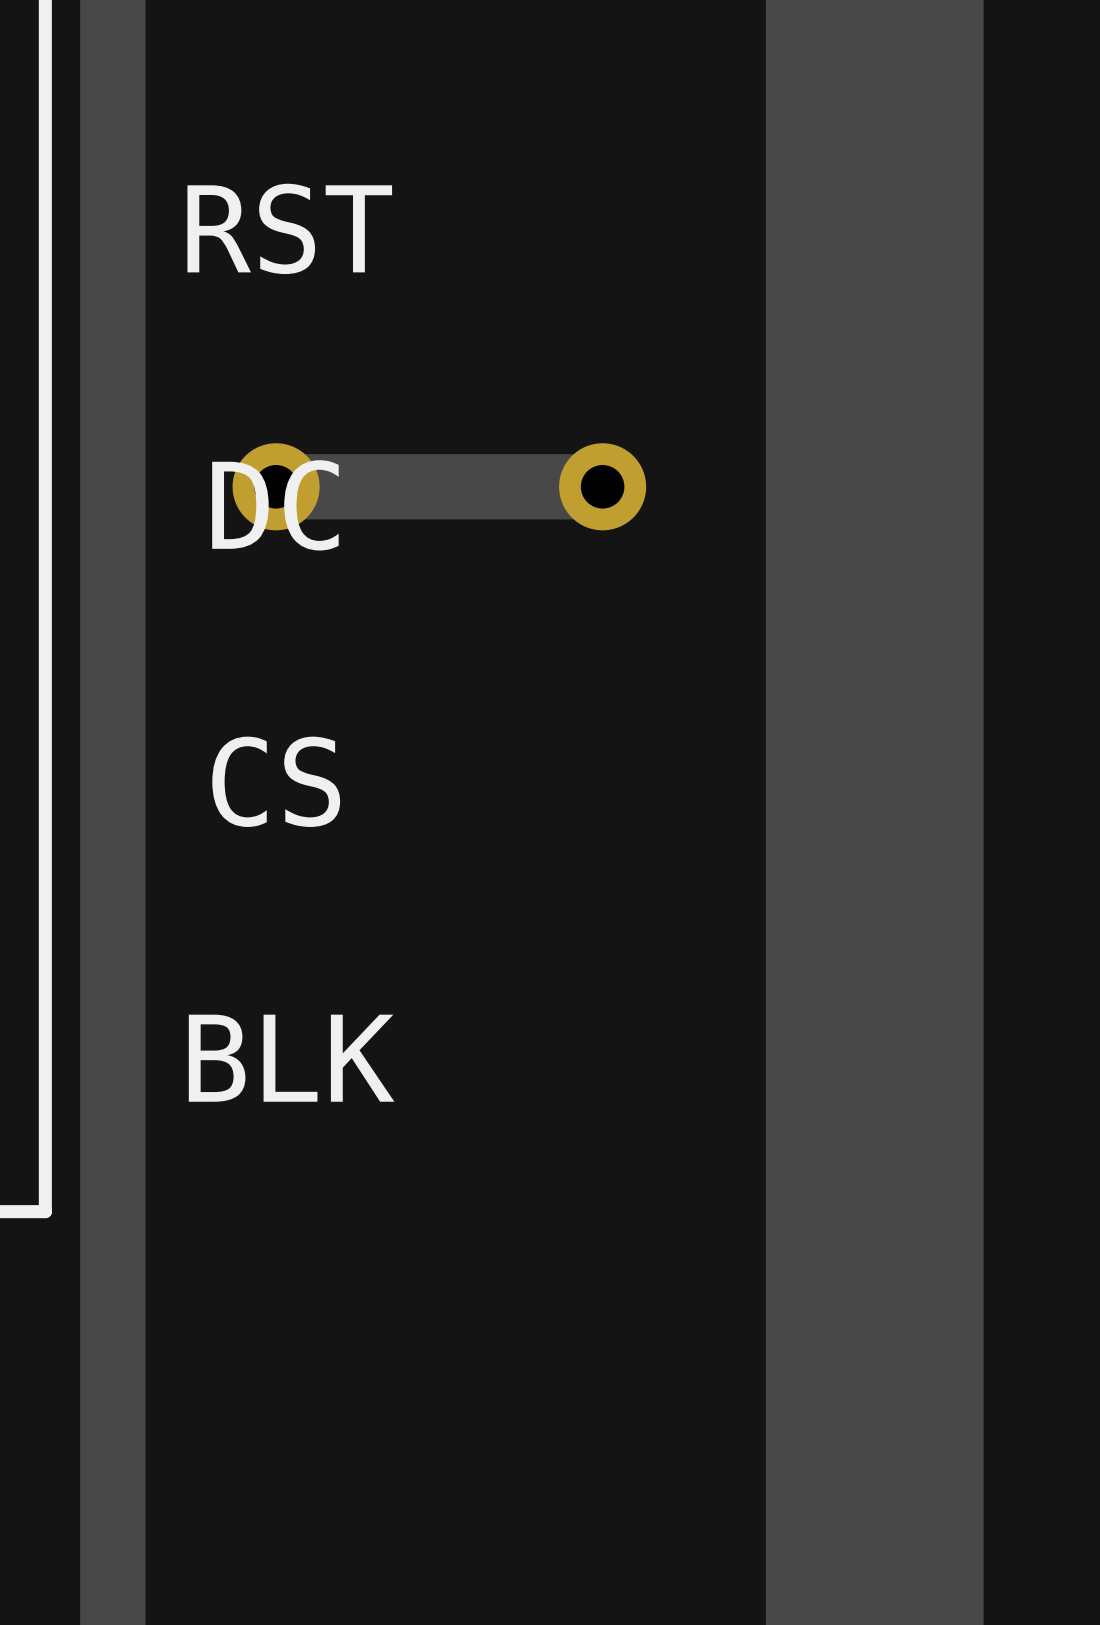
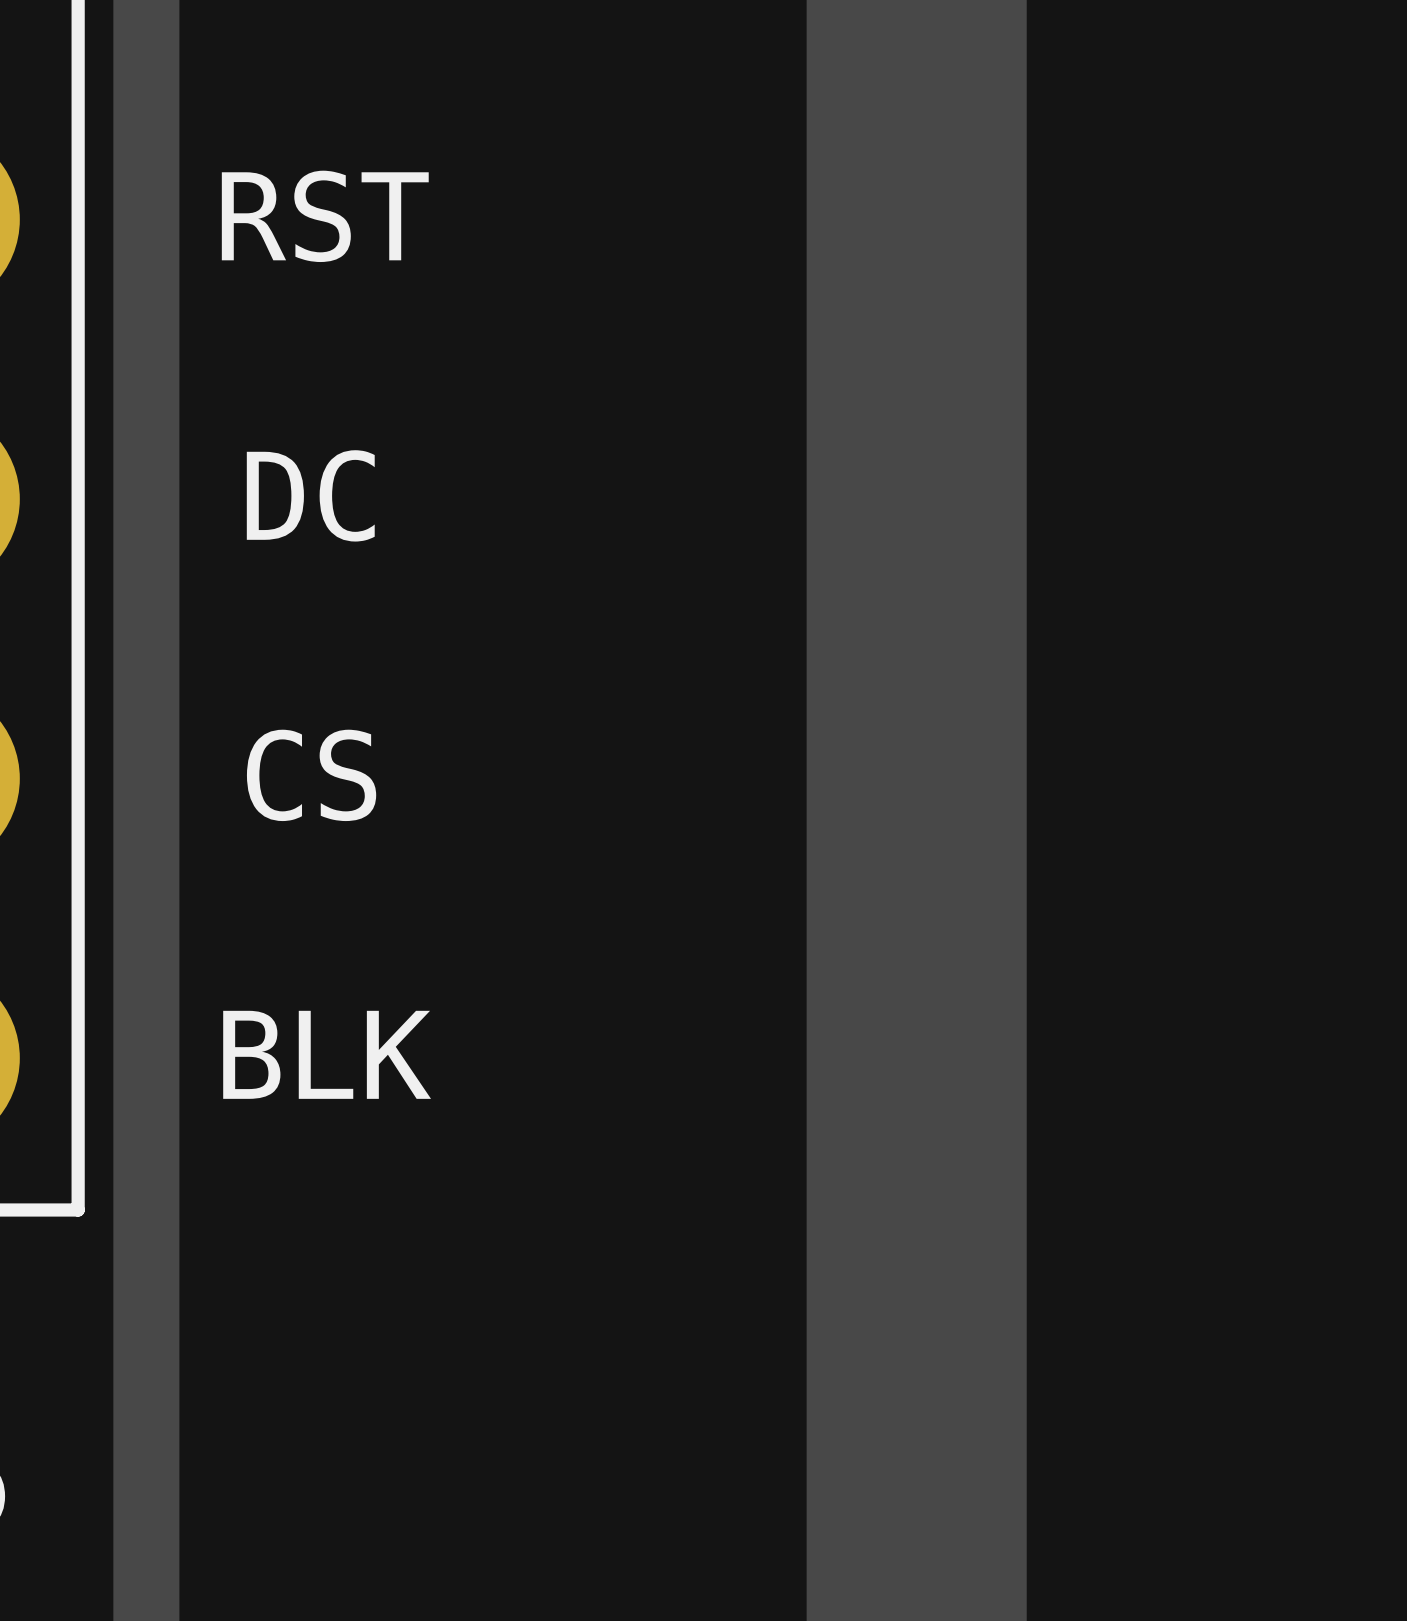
track: (276, 486) (602, 486) -> none
via: (276, 486) -> none
via: (602, 486) -> none

